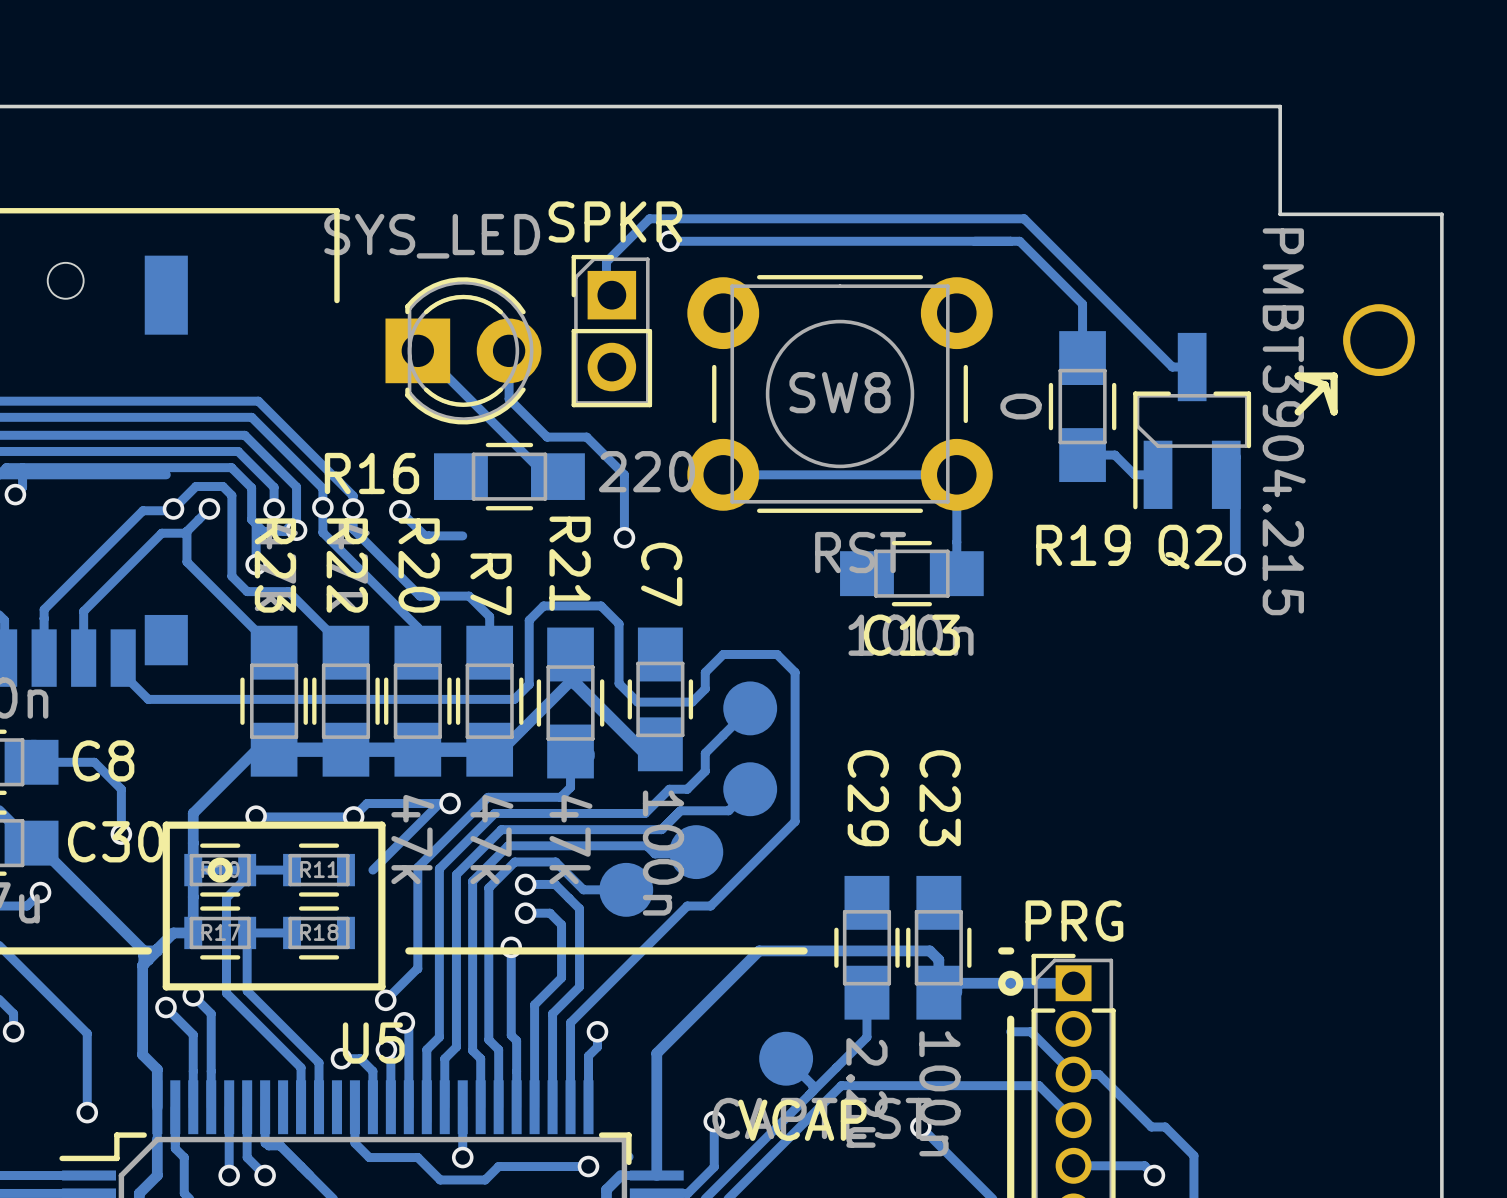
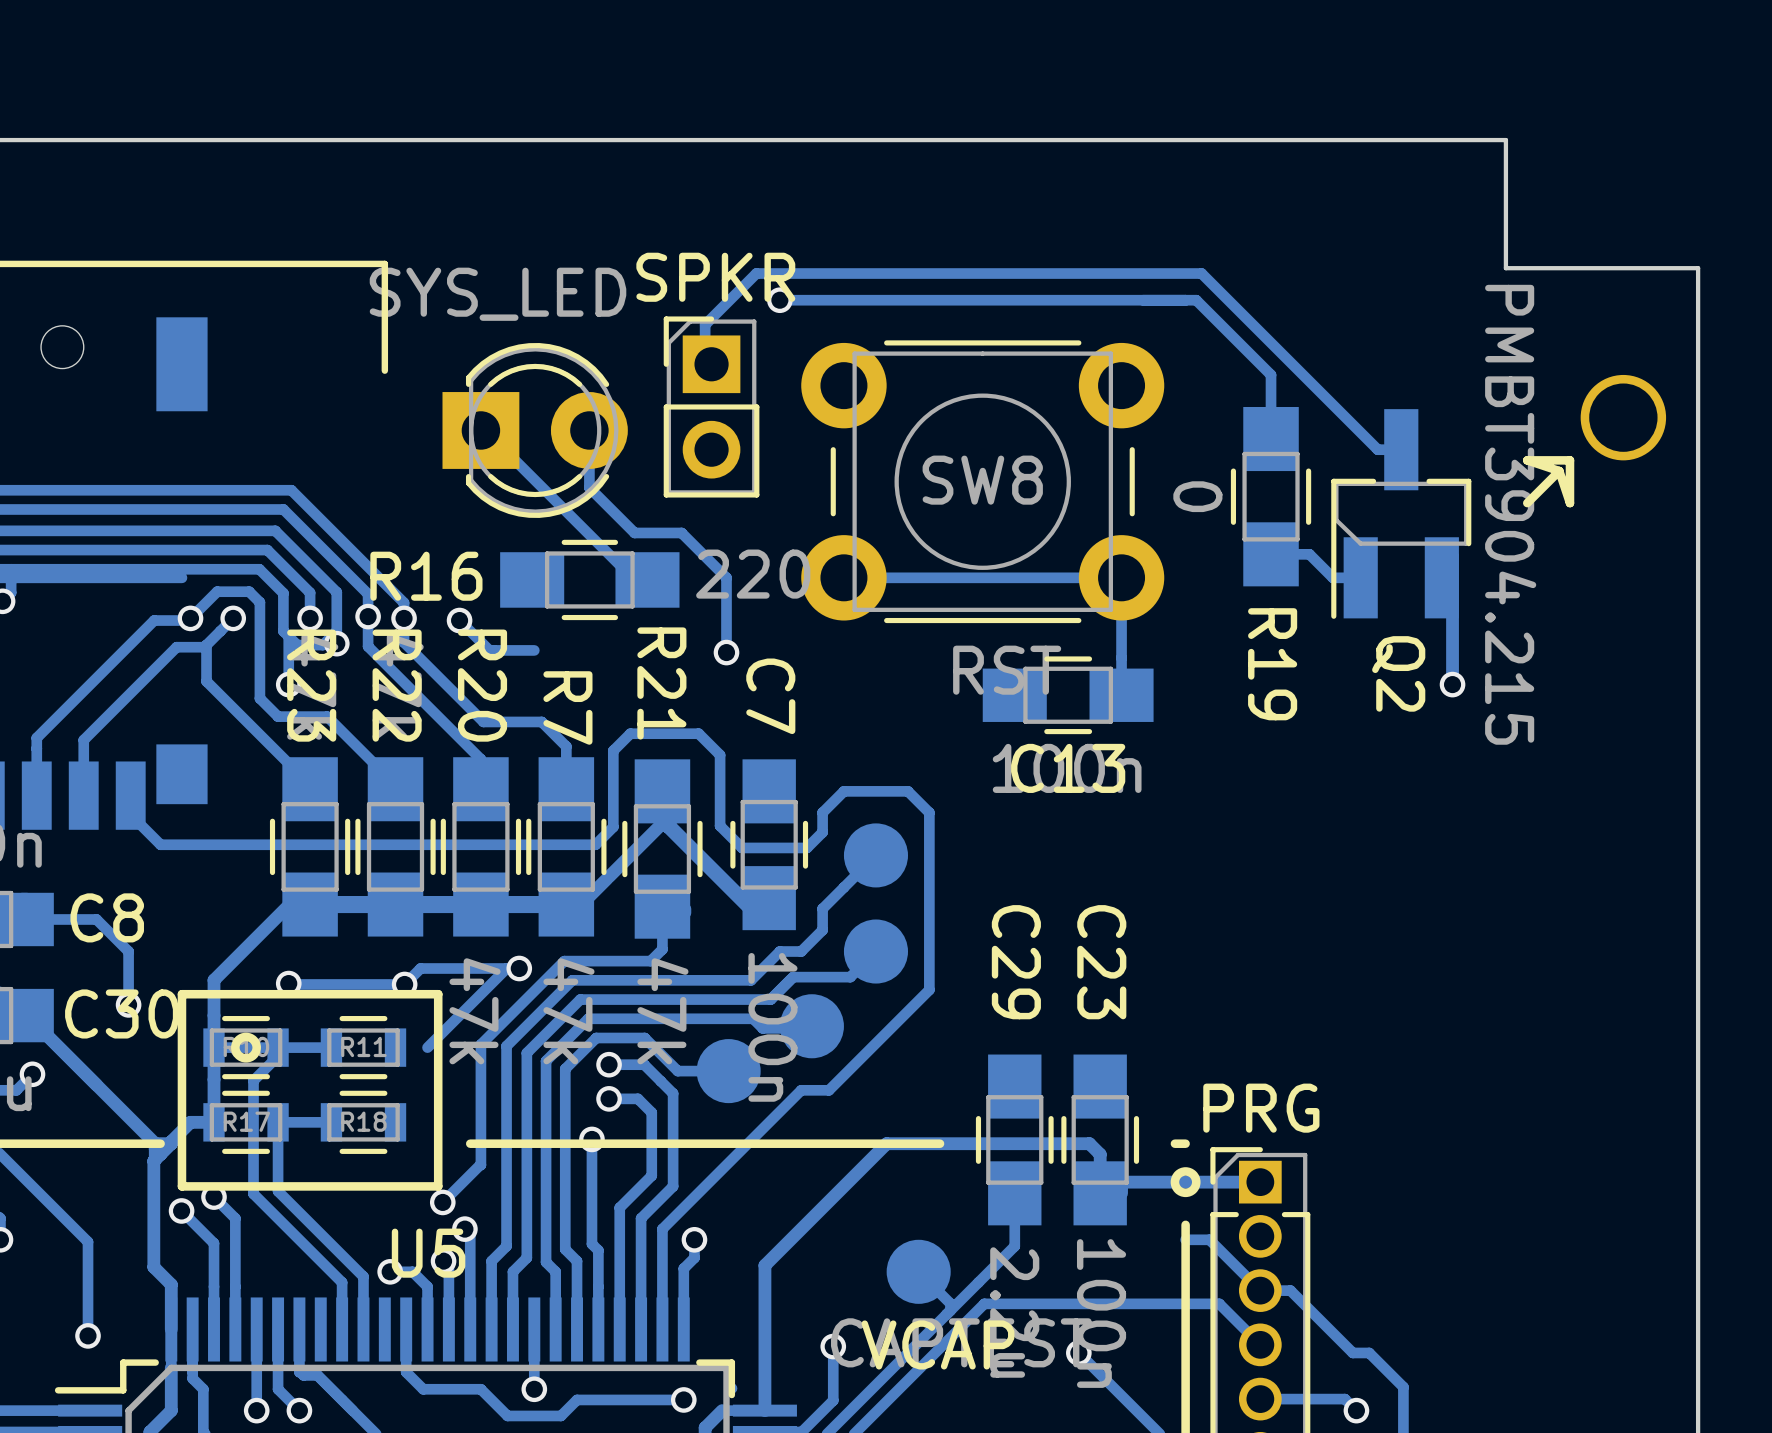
R19 name rotation: 0° (1083, 545) -> 90° clockwise (1272, 664)
Q2 name rotation: 0° (1190, 547) -> 90° clockwise (1398, 673)

